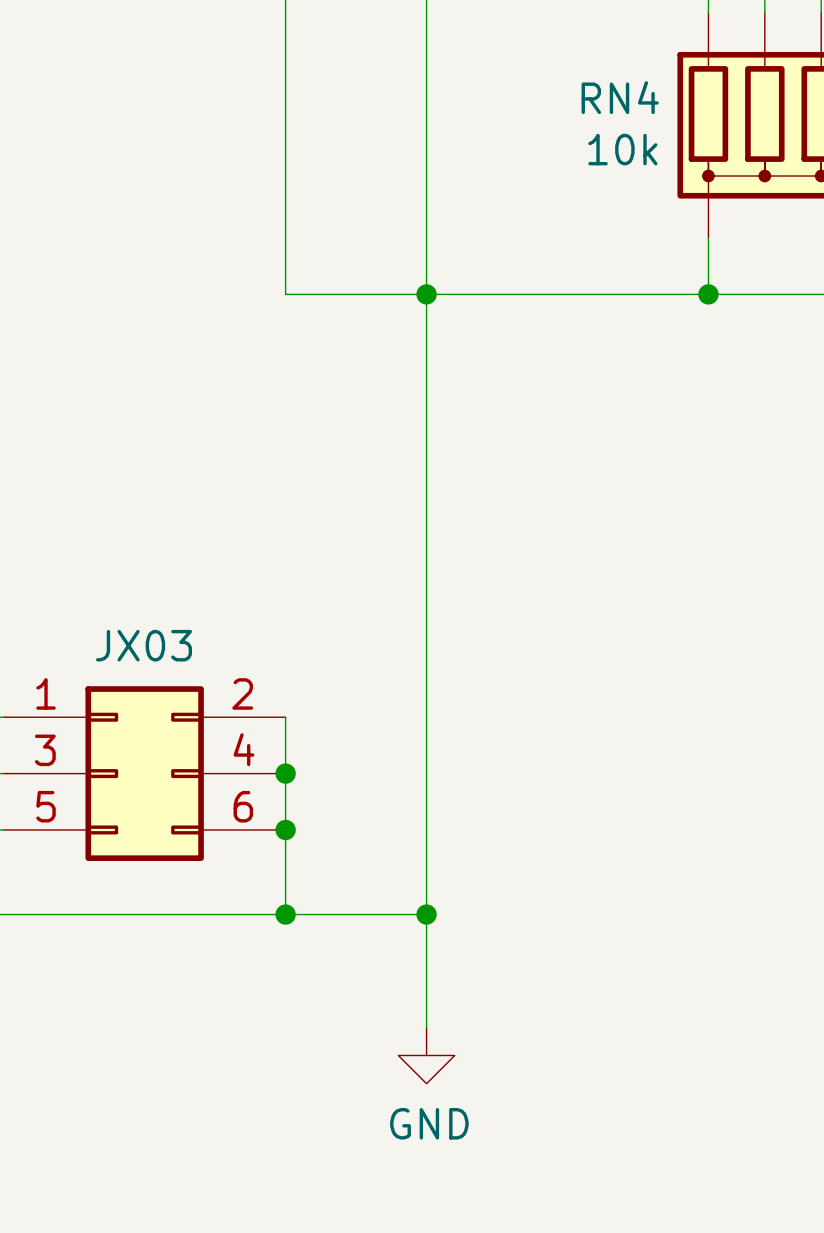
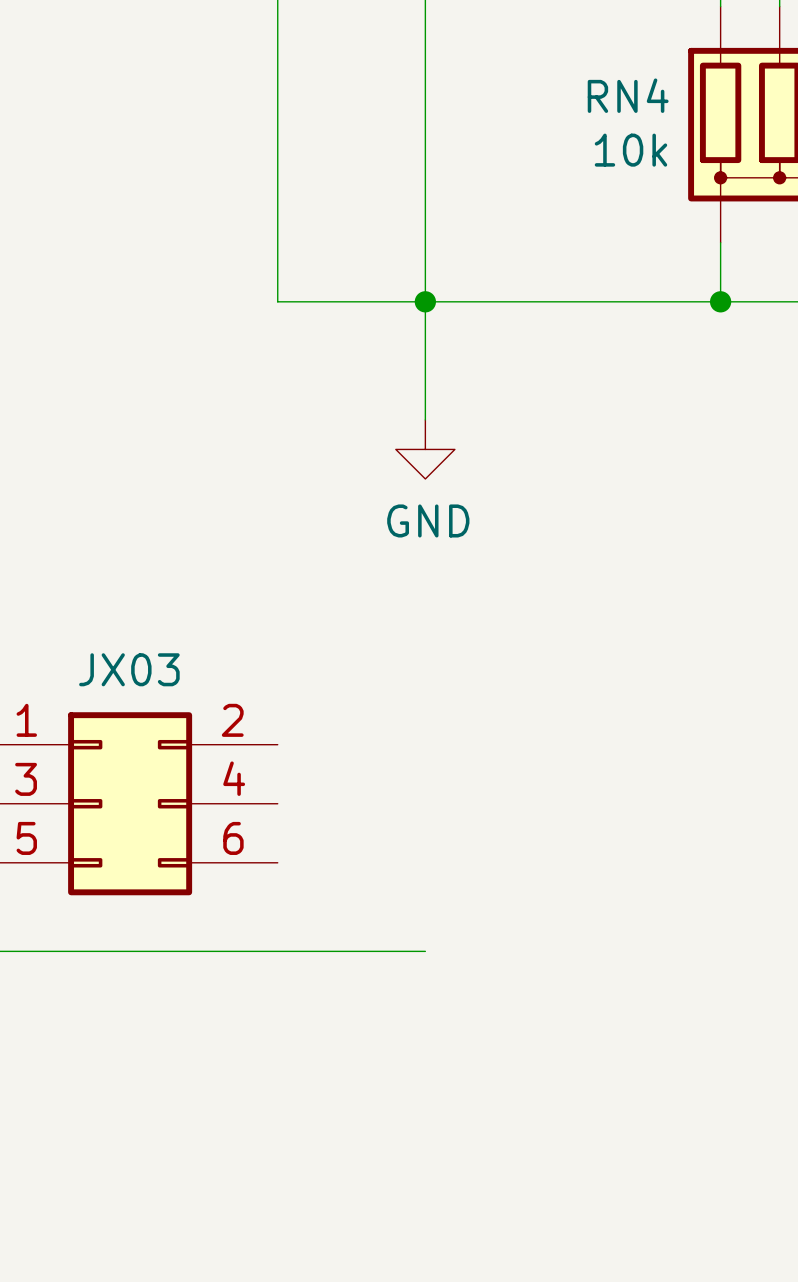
wire: (426, 407) (426, 1027) -> none
power symbol: none -> GND (425, 449)
wire: (285, 717) (285, 914) -> none
junction: (285, 773) -> none
junction: (285, 829) -> none
junction: (285, 914) -> none
junction: (426, 914) -> none
power symbol: GND (426, 1055) -> none

